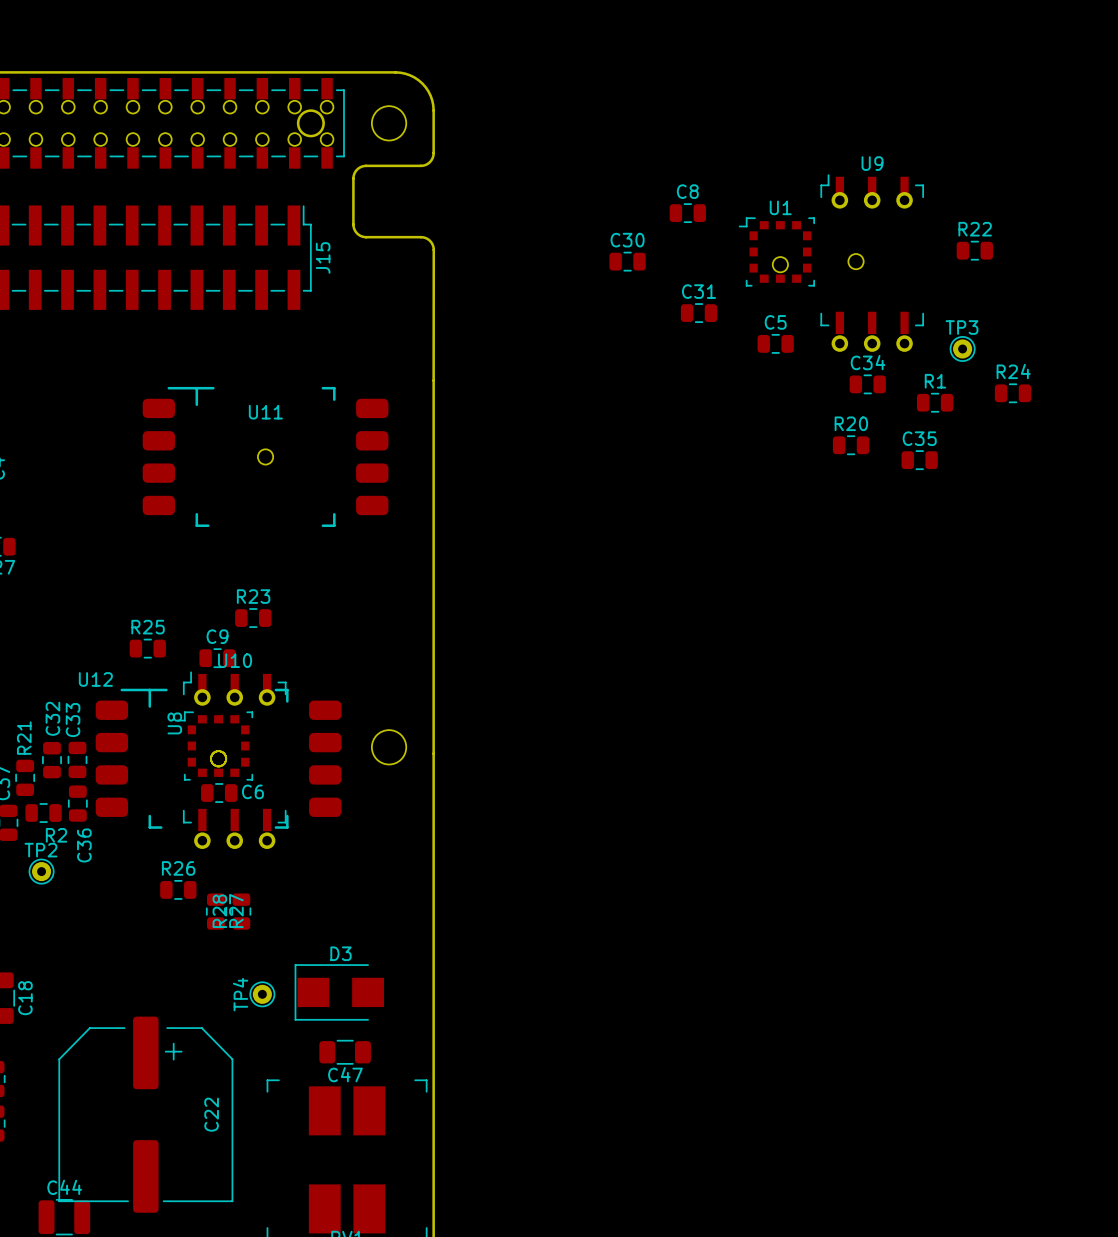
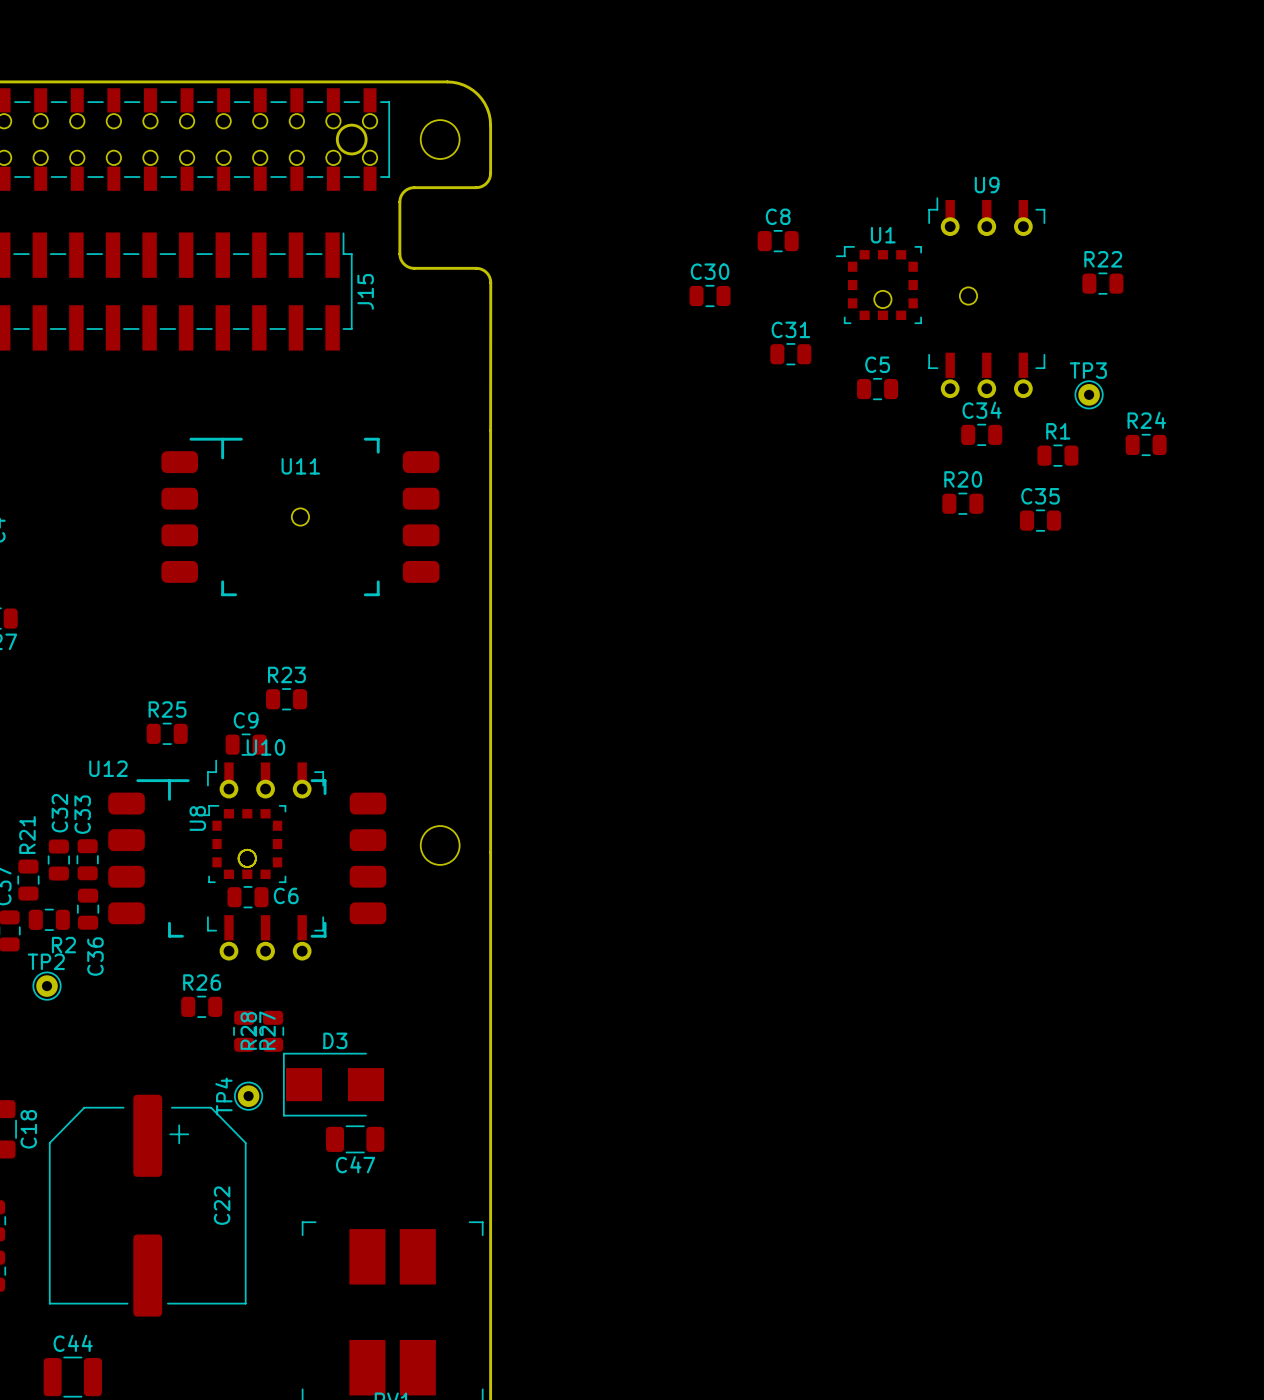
D3 position: (339, 992) -> (333, 1084)
TP4 position: (262, 994) -> (248, 1096)
C47 position: (345, 1052) -> (355, 1139)
C22 position: (145, 1114) -> (147, 1205)

